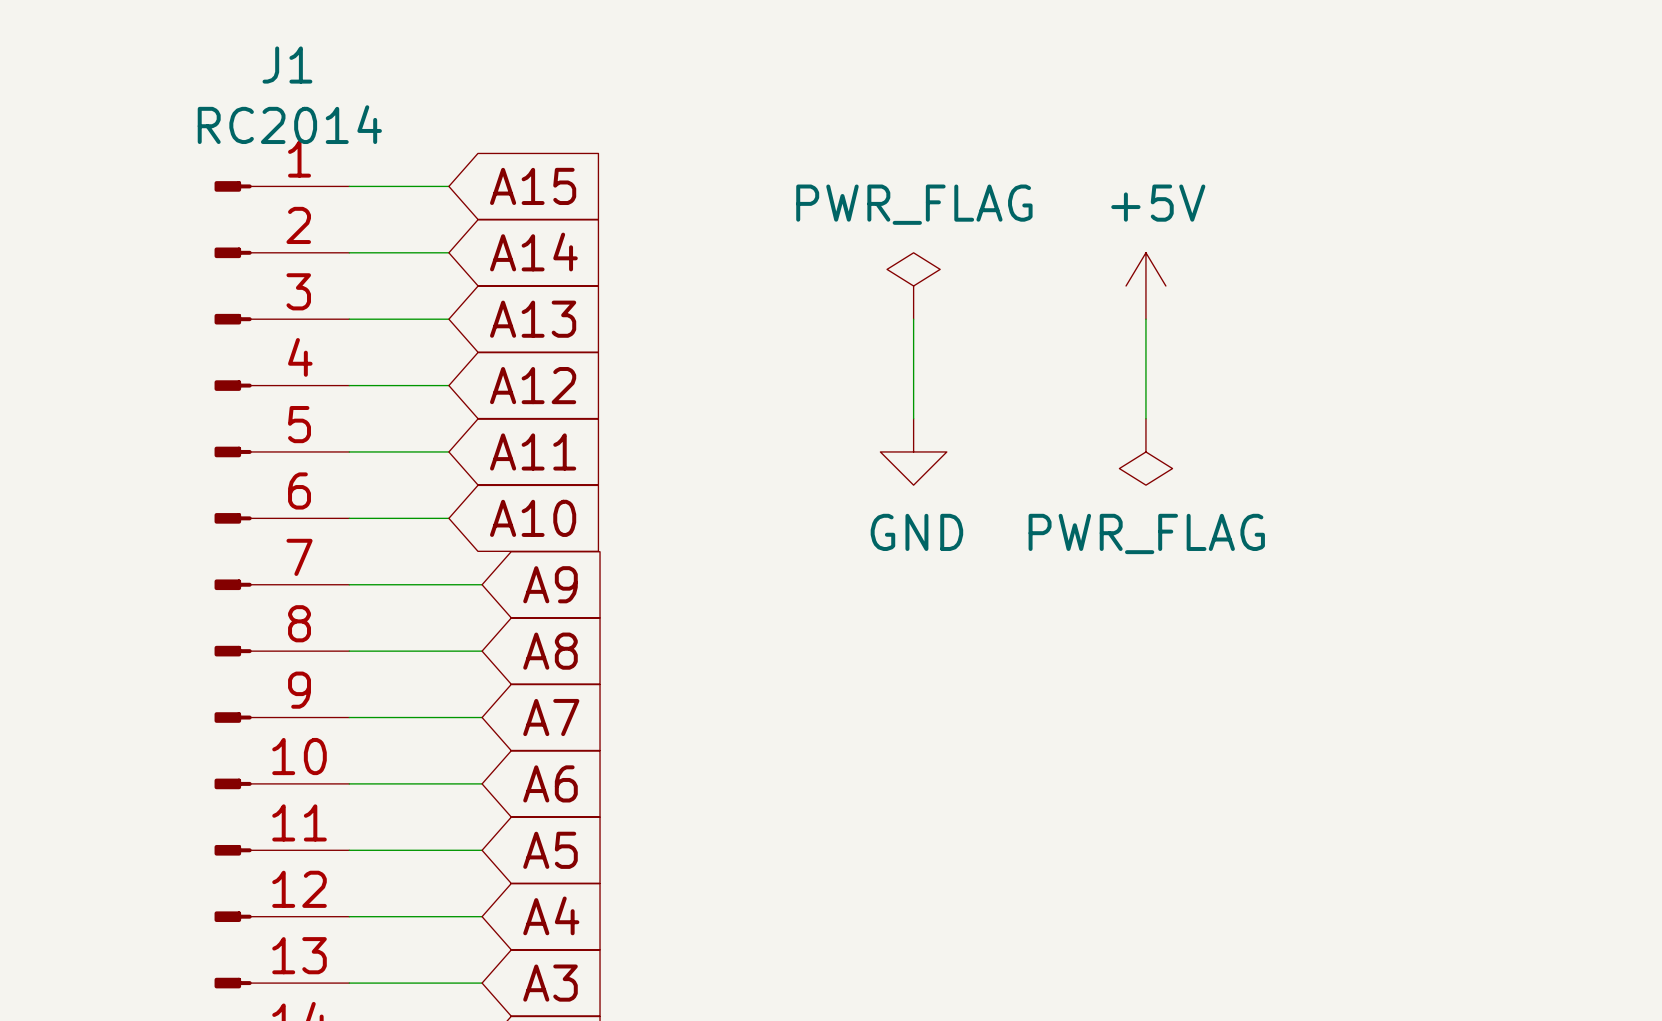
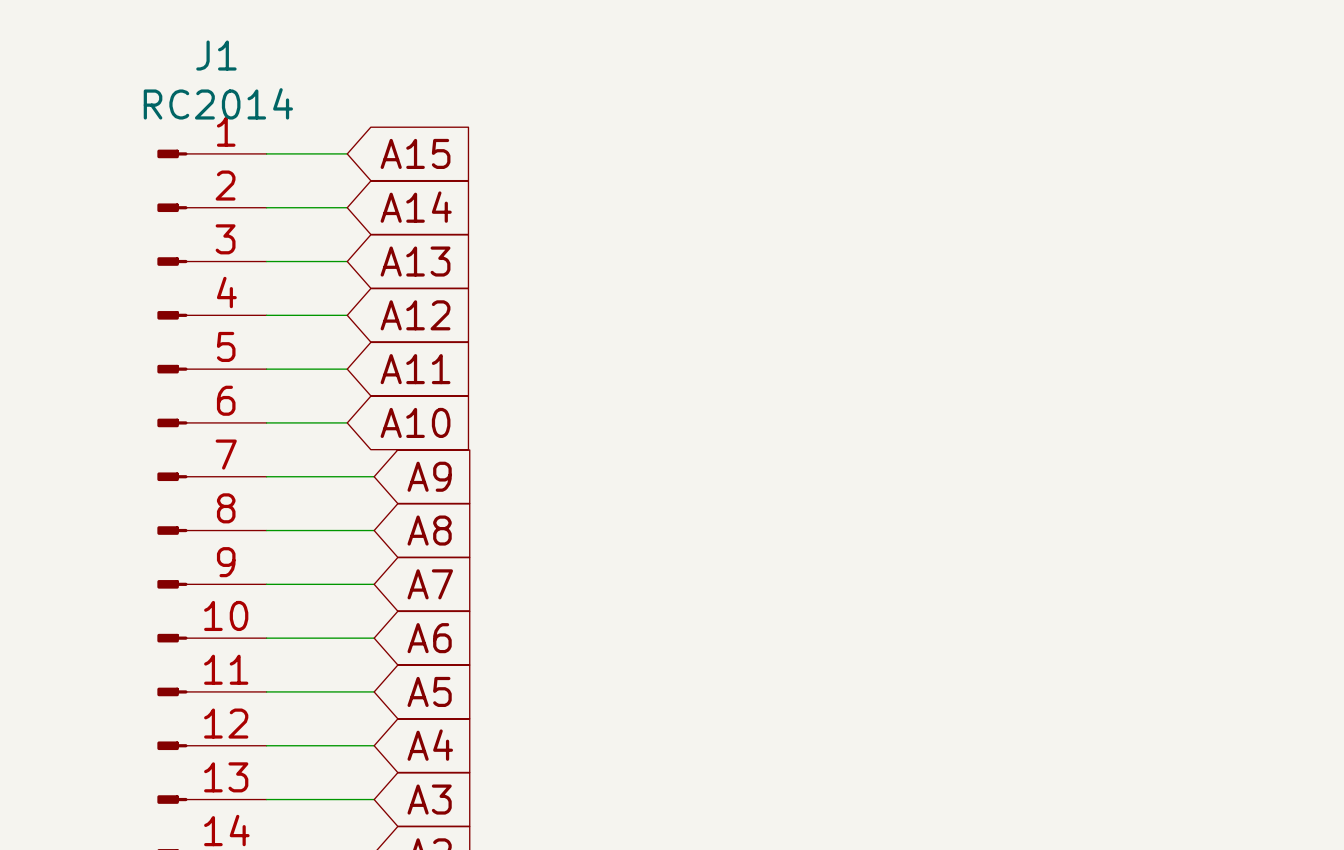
power symbol: PWR_FLAG (913, 286) -> none
power symbol: +5V (1145, 286) -> none
wire: (913, 319) (913, 418) -> none
wire: (1145, 319) (1145, 418) -> none
power symbol: GND (913, 451) -> none
power symbol: PWR_FLAG (1145, 451) -> none

